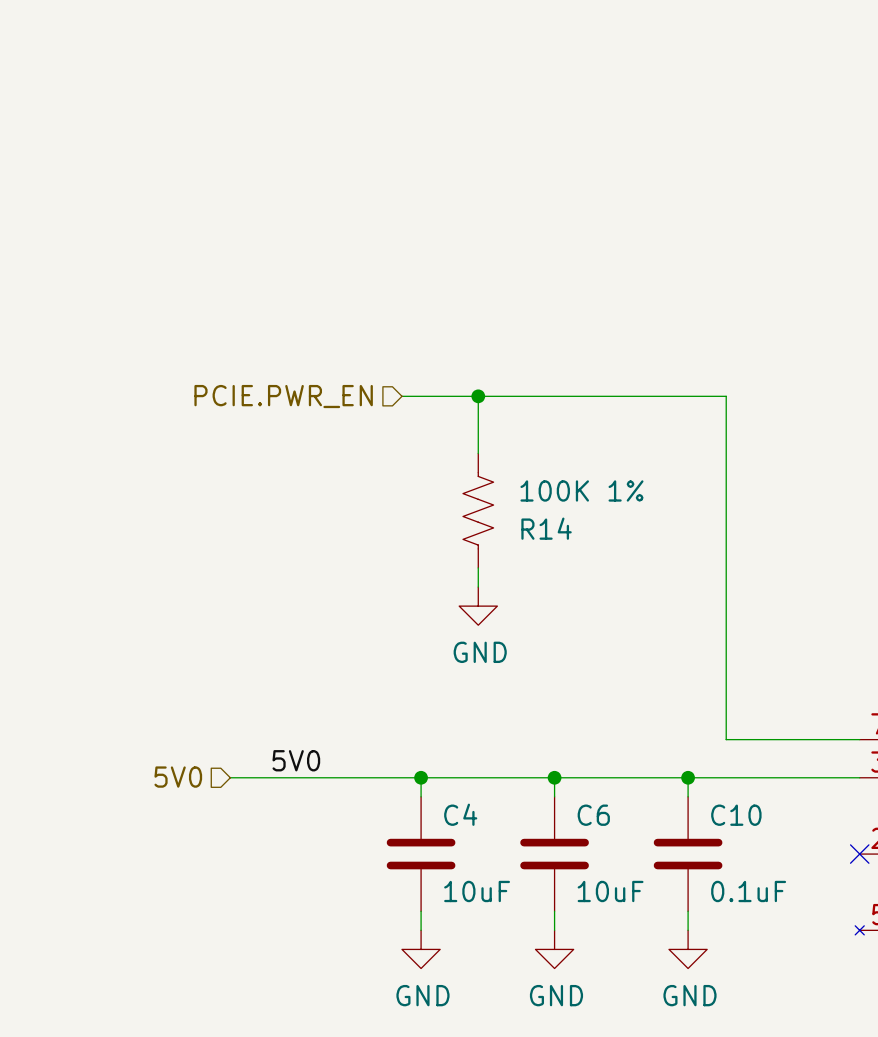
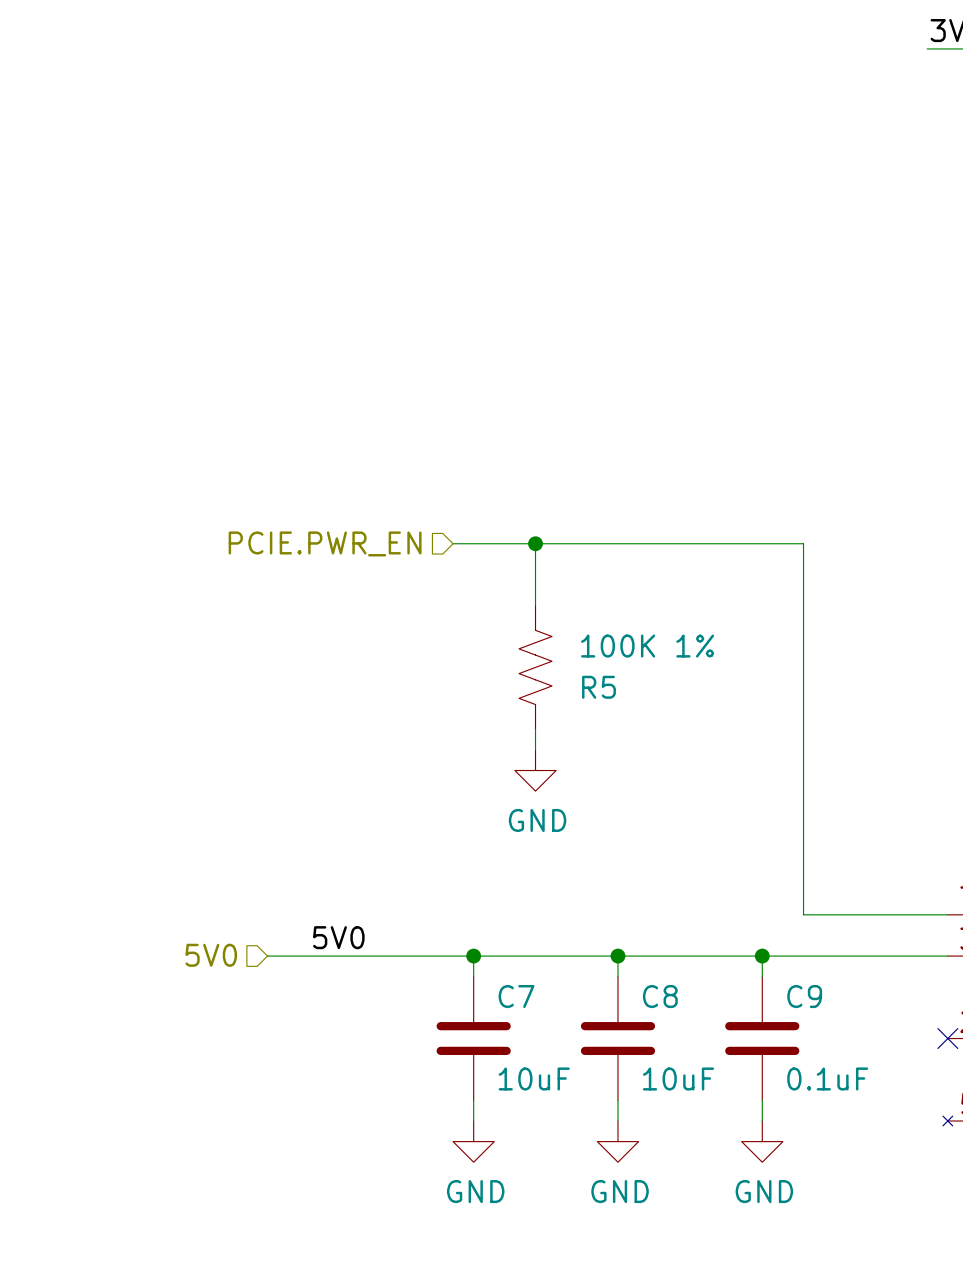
R14 name: R14 (546, 528) -> R5 (598, 687)
C4 name: C4 (460, 814) -> C7 (516, 996)
C6 name: C6 (593, 815) -> C8 (660, 996)
C10 name: C10 (736, 815) -> C9 (804, 996)

